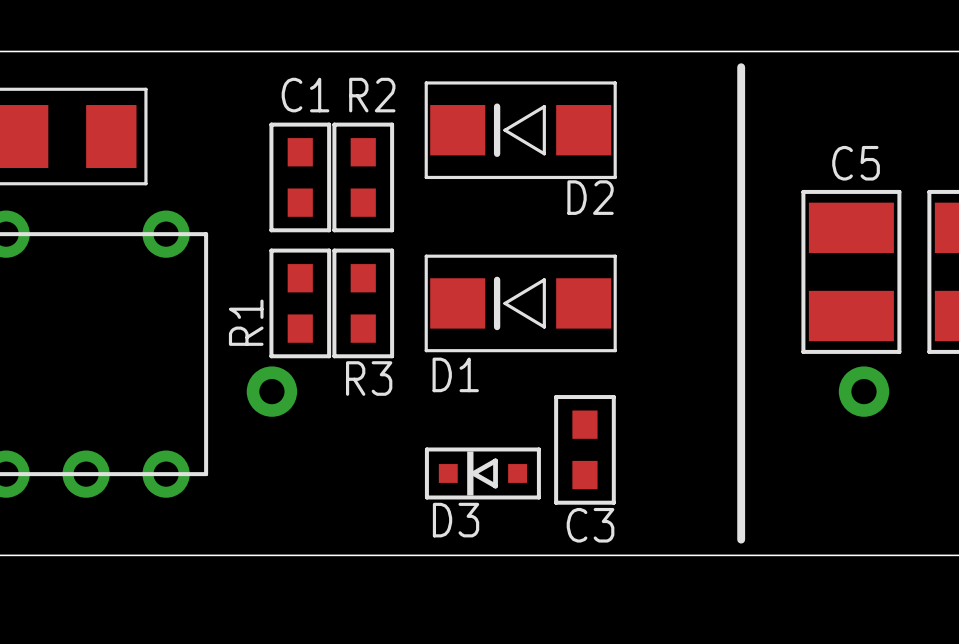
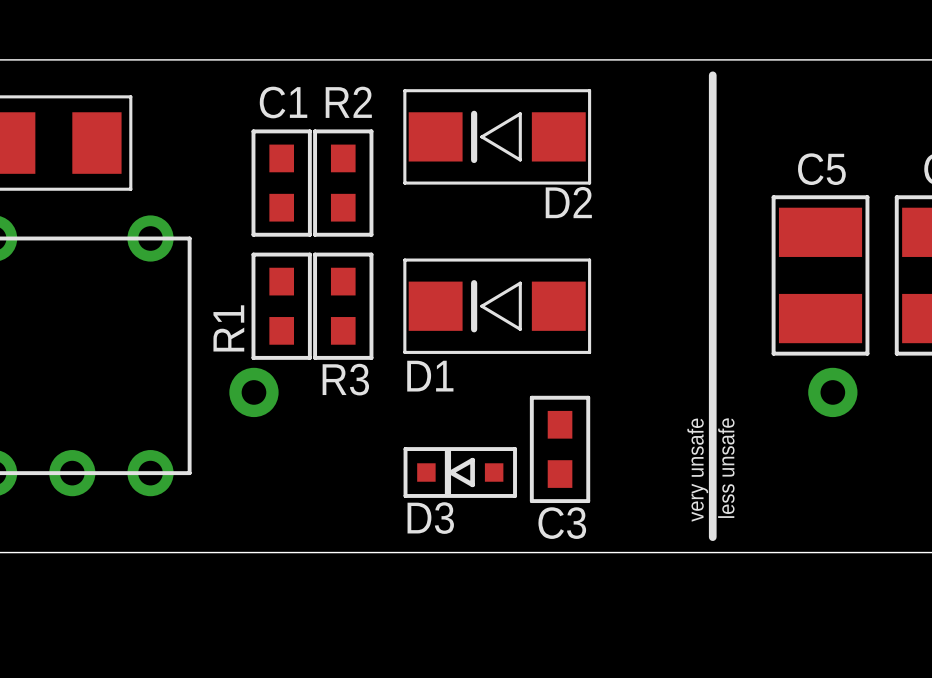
text: none -> less unsafe (726, 468)
text: none -> very unsafe (697, 470)

